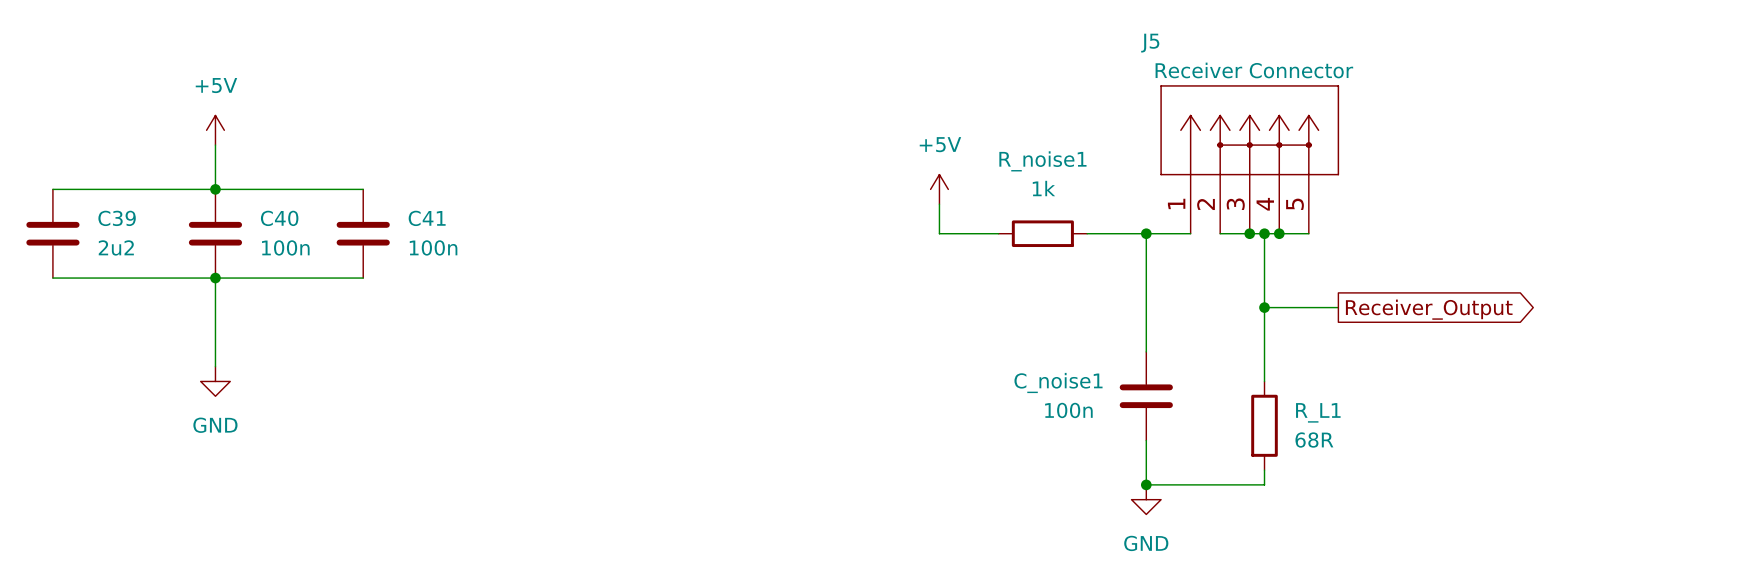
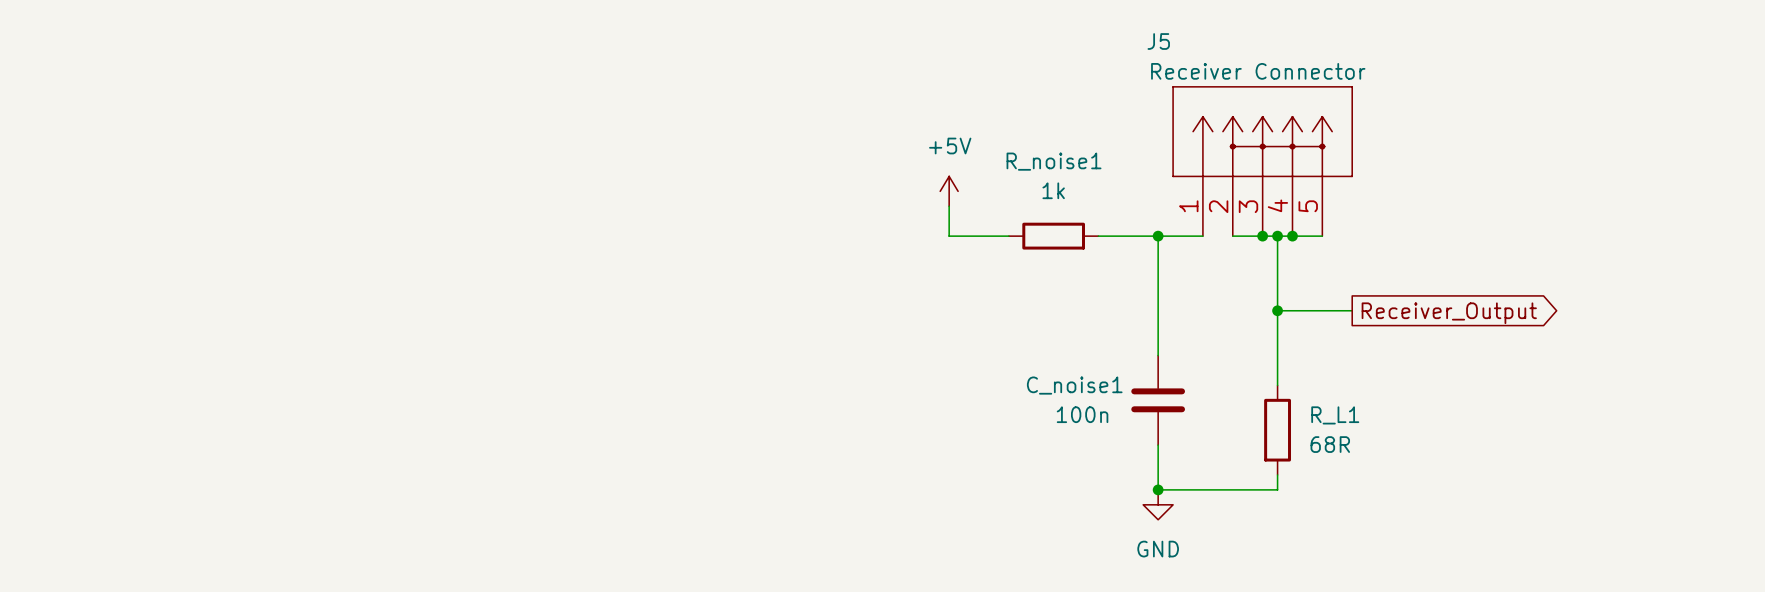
power symbol: +5V (215, 130) -> none
wire: (215, 145) (215, 189) -> none
wire: (52, 189) (363, 189) -> none
junction: (215, 189) -> none
C39: 2u2 (52, 233) -> none
C40: 100n (215, 233) -> none
C41: 100n (363, 233) -> none
wire: (52, 278) (363, 278) -> none
wire: (215, 278) (215, 366) -> none
junction: (215, 278) -> none
power symbol: GND (215, 381) -> none

